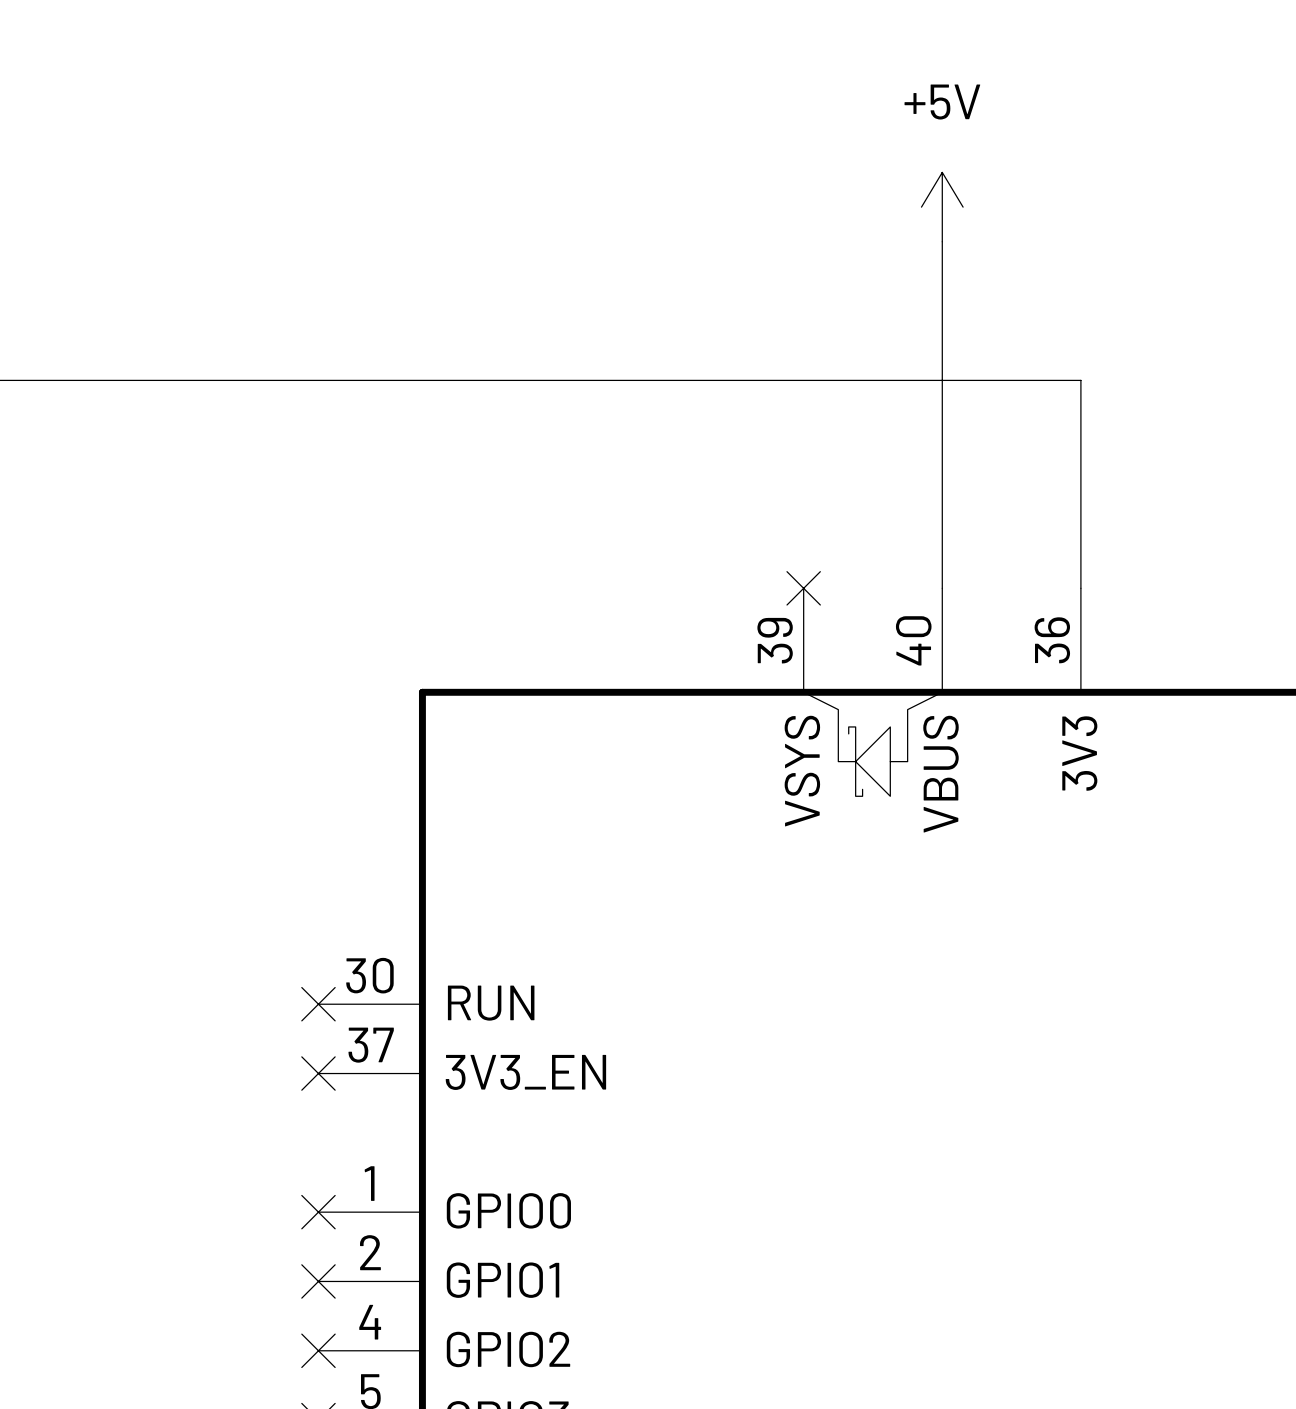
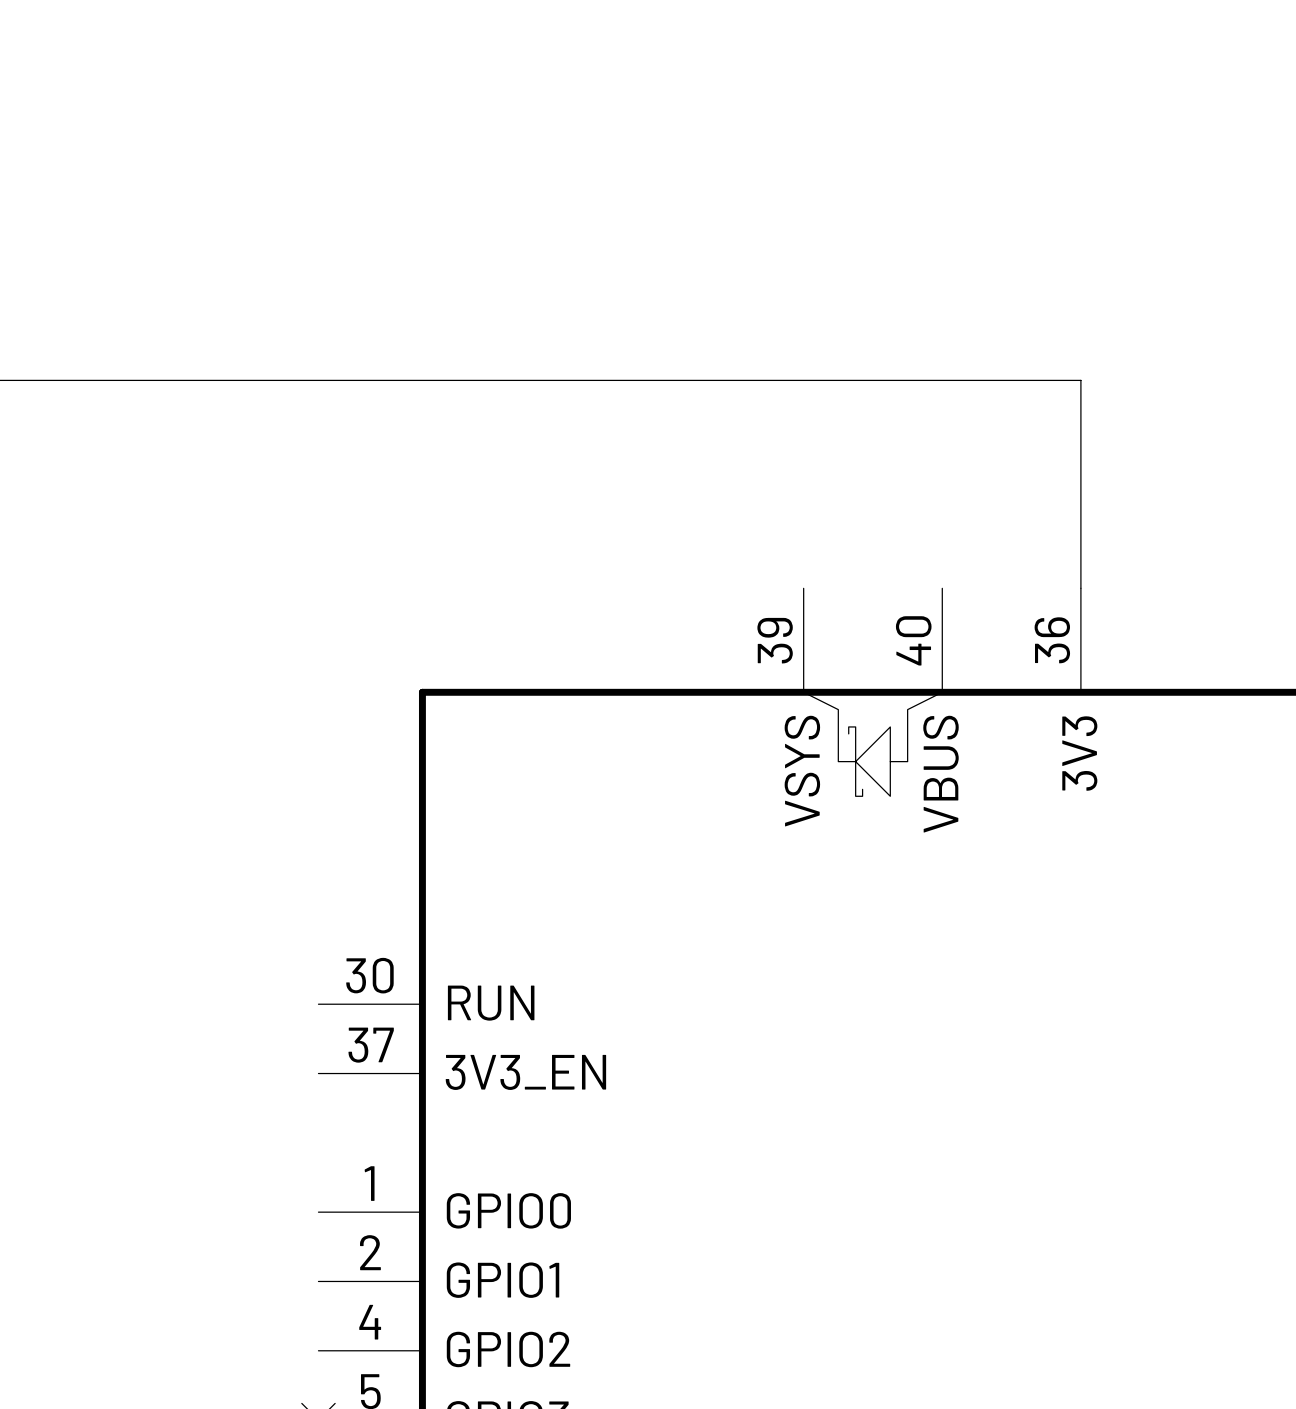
power symbol: +5V (942, 207) -> none
wire: (942, 241) (942, 588) -> none
no-connect mark: (803, 588) -> none
no-connect mark: (318, 1004) -> none
no-connect mark: (318, 1073) -> none
no-connect mark: (318, 1212) -> none
no-connect mark: (318, 1281) -> none
no-connect mark: (318, 1350) -> none

